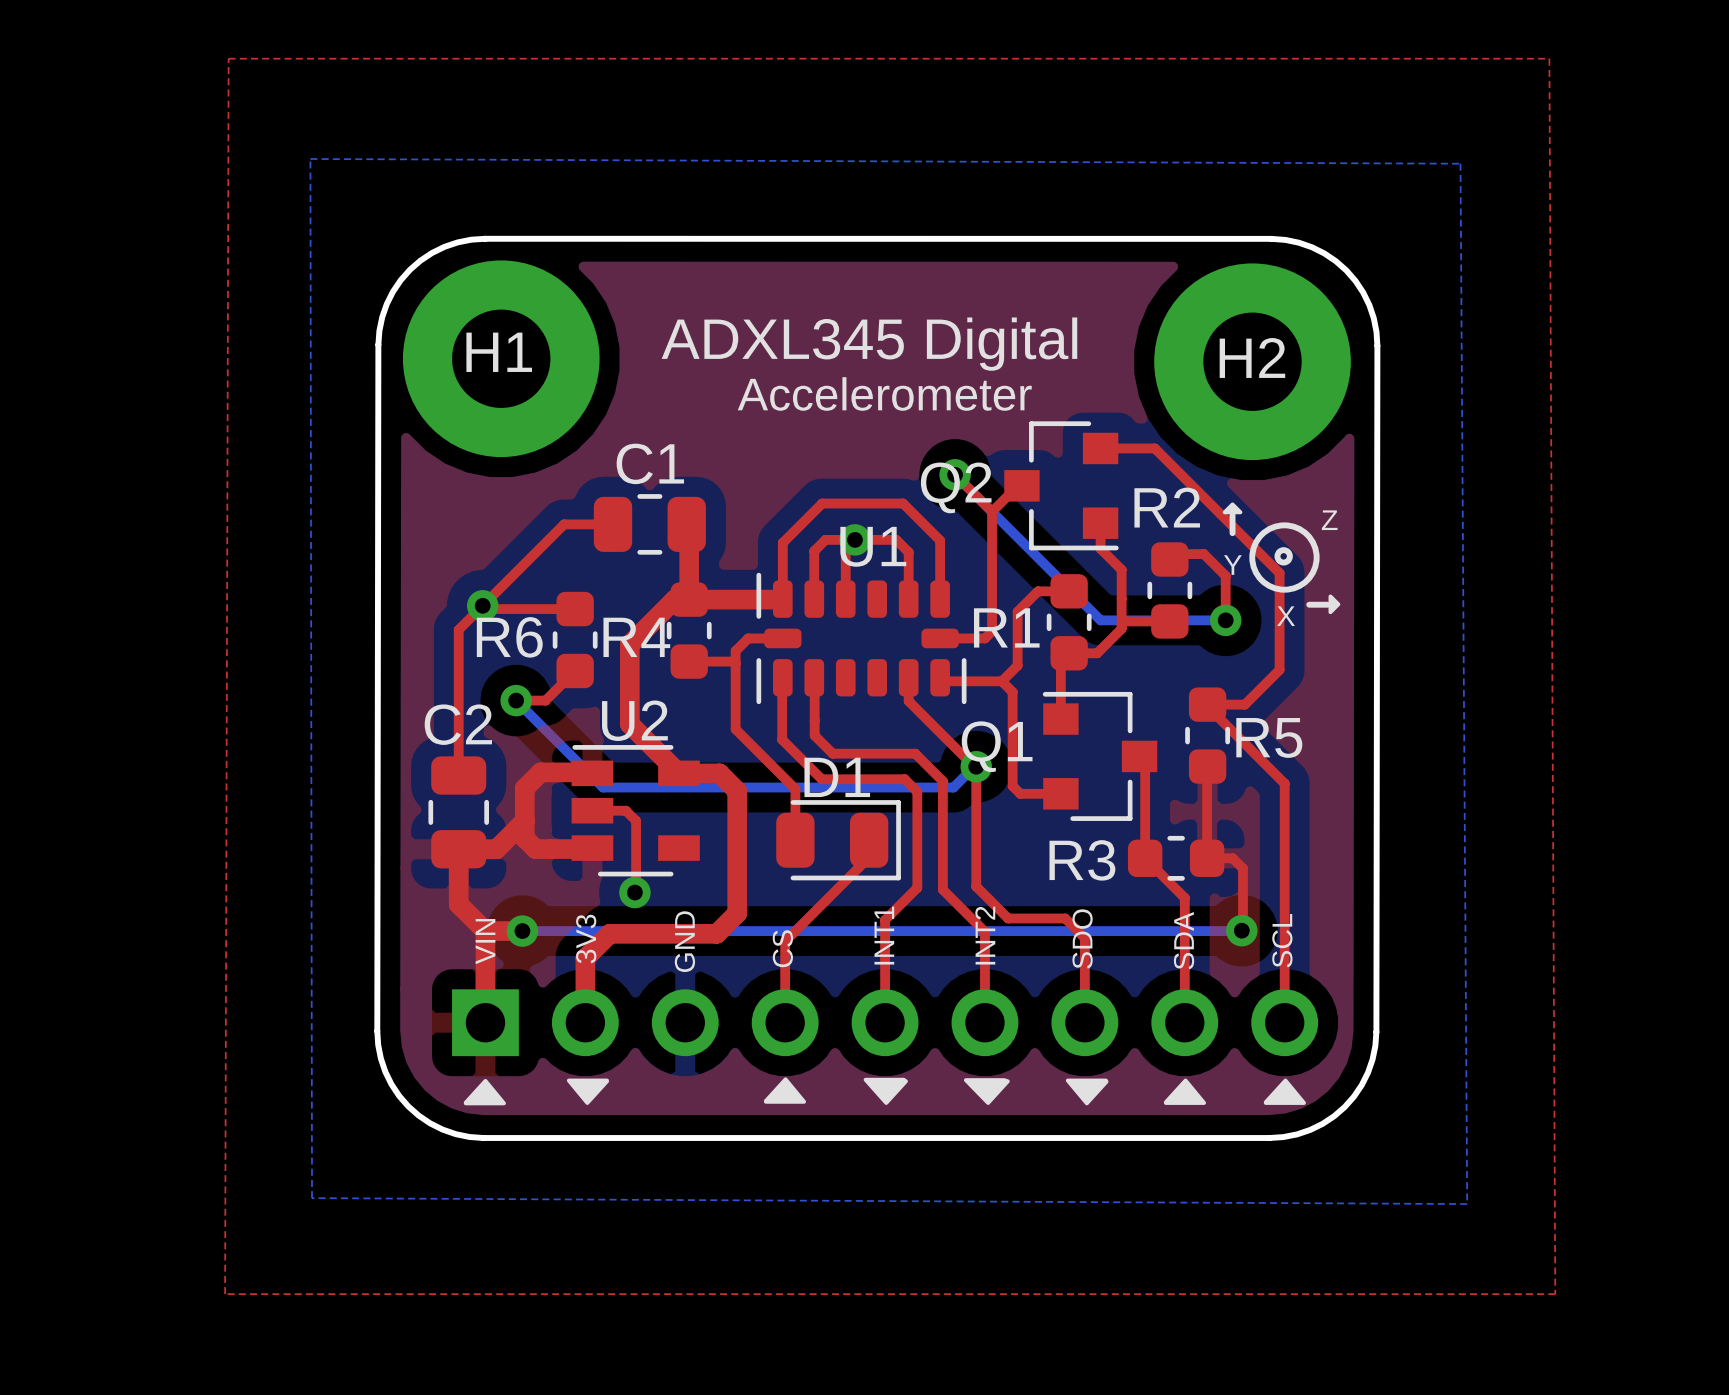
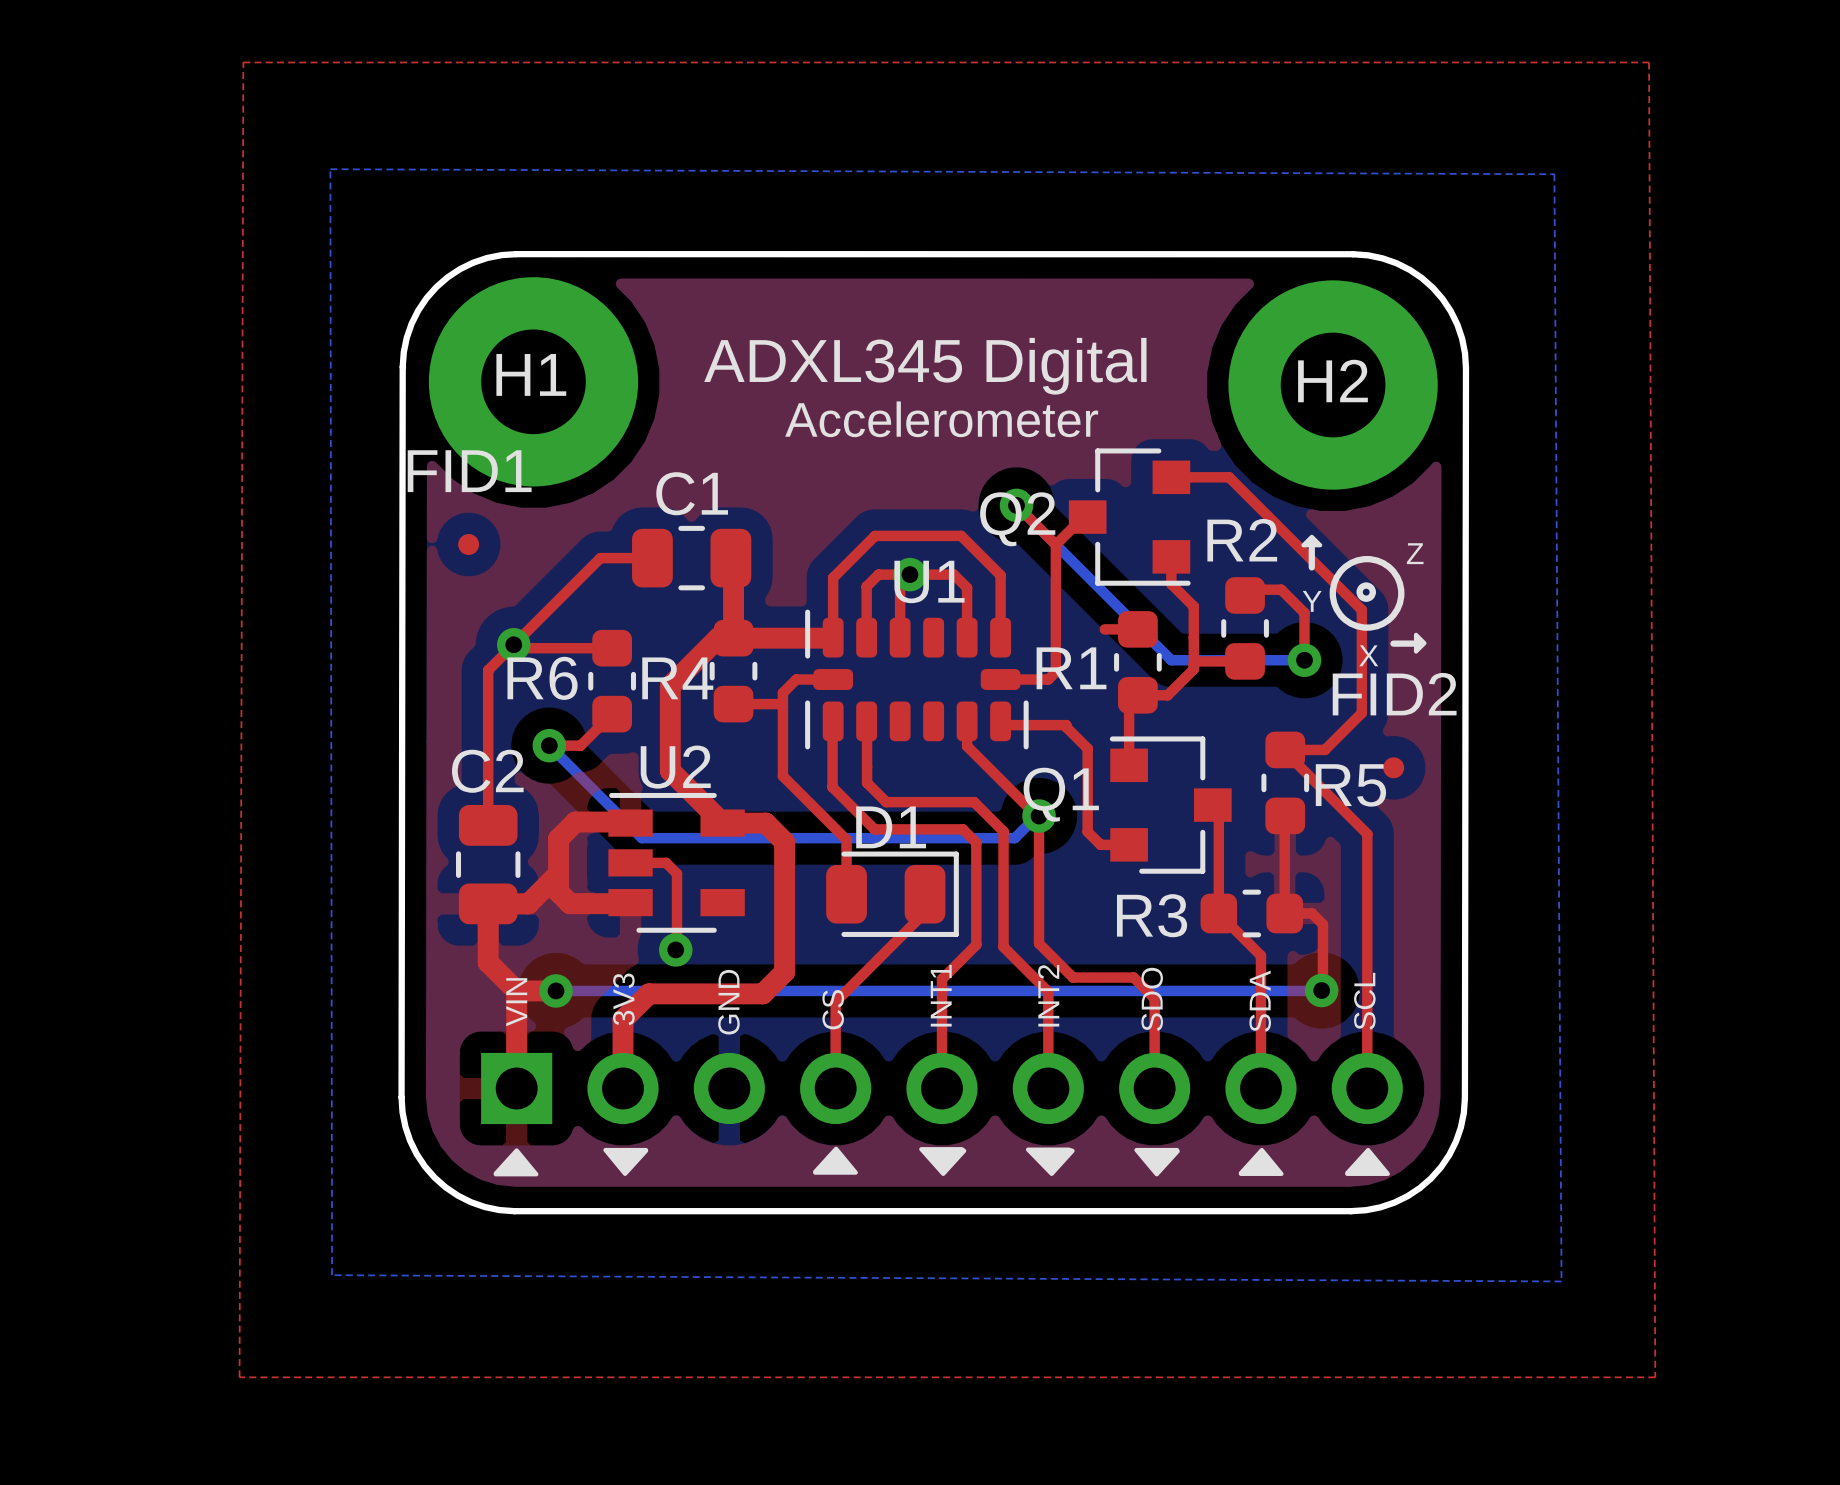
FID1: none -> (468, 544)
top track: (1037, 591) (1017, 611) (1017, 665) (1001, 681) (1012, 692) (1012, 786) (1020, 793) (1034, 793) -> (1066, 725) (1087, 748) (1087, 831) (1100, 844)
FID2: none -> (1393, 767)

